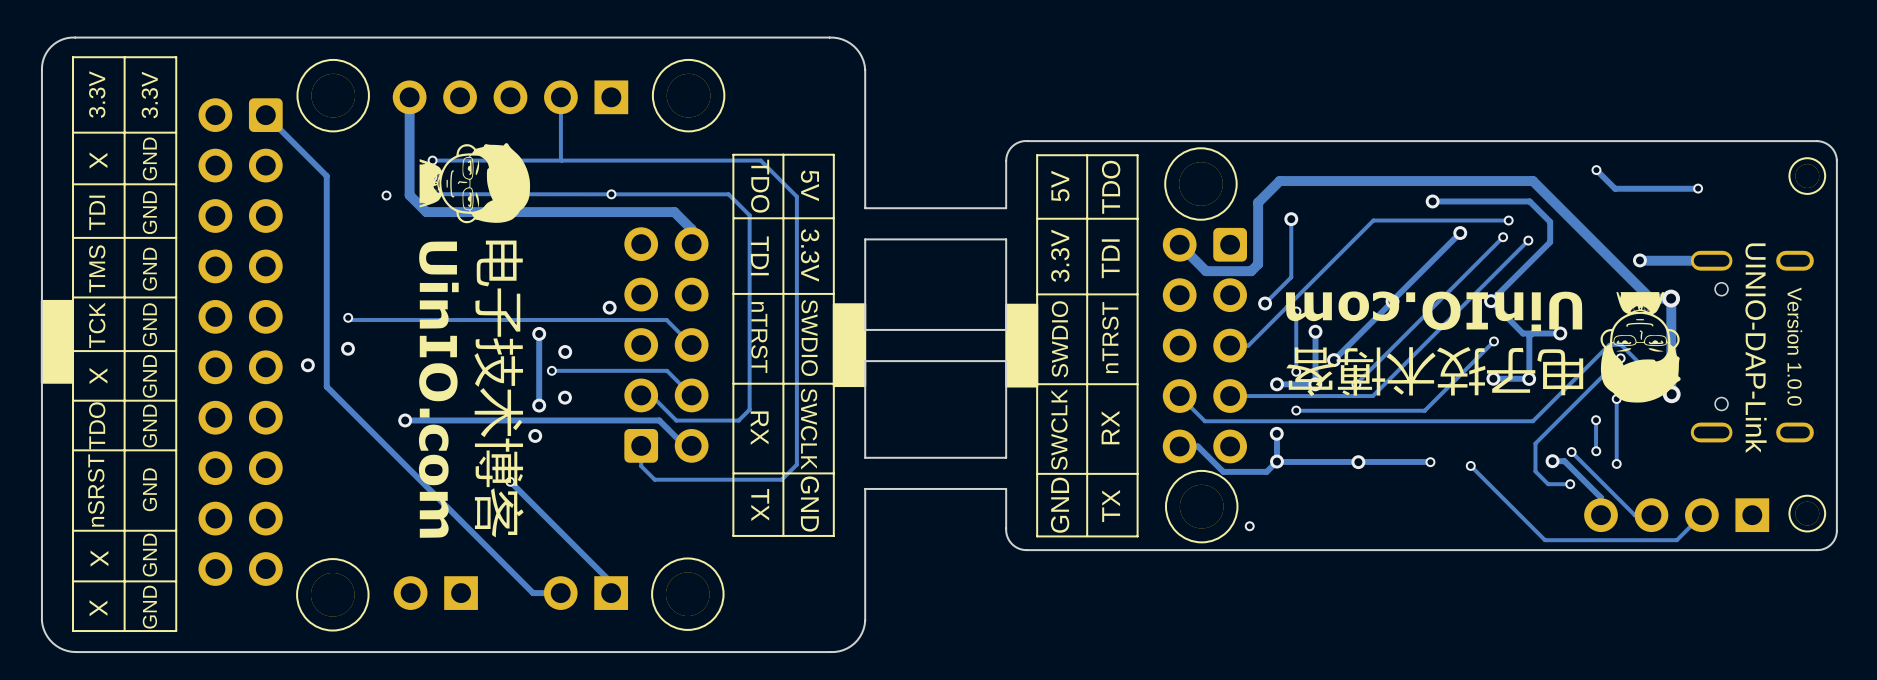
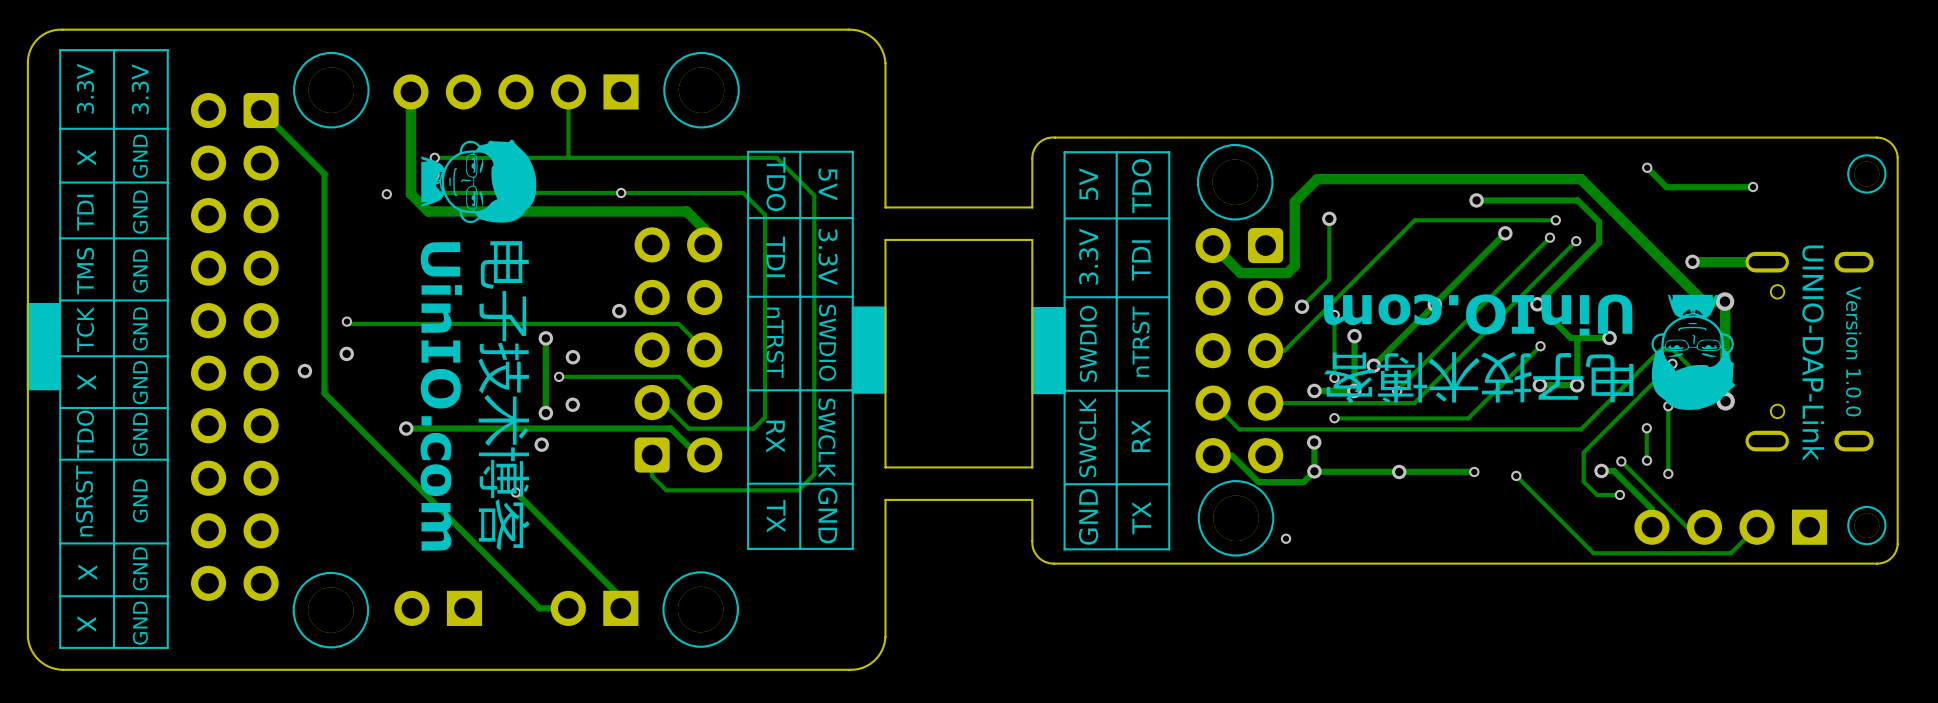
board edge: (1006, 329) (865, 329) -> (1032, 334) (1032, 366)
board edge: (1006, 361) (865, 361) -> (885, 334) (885, 366)

